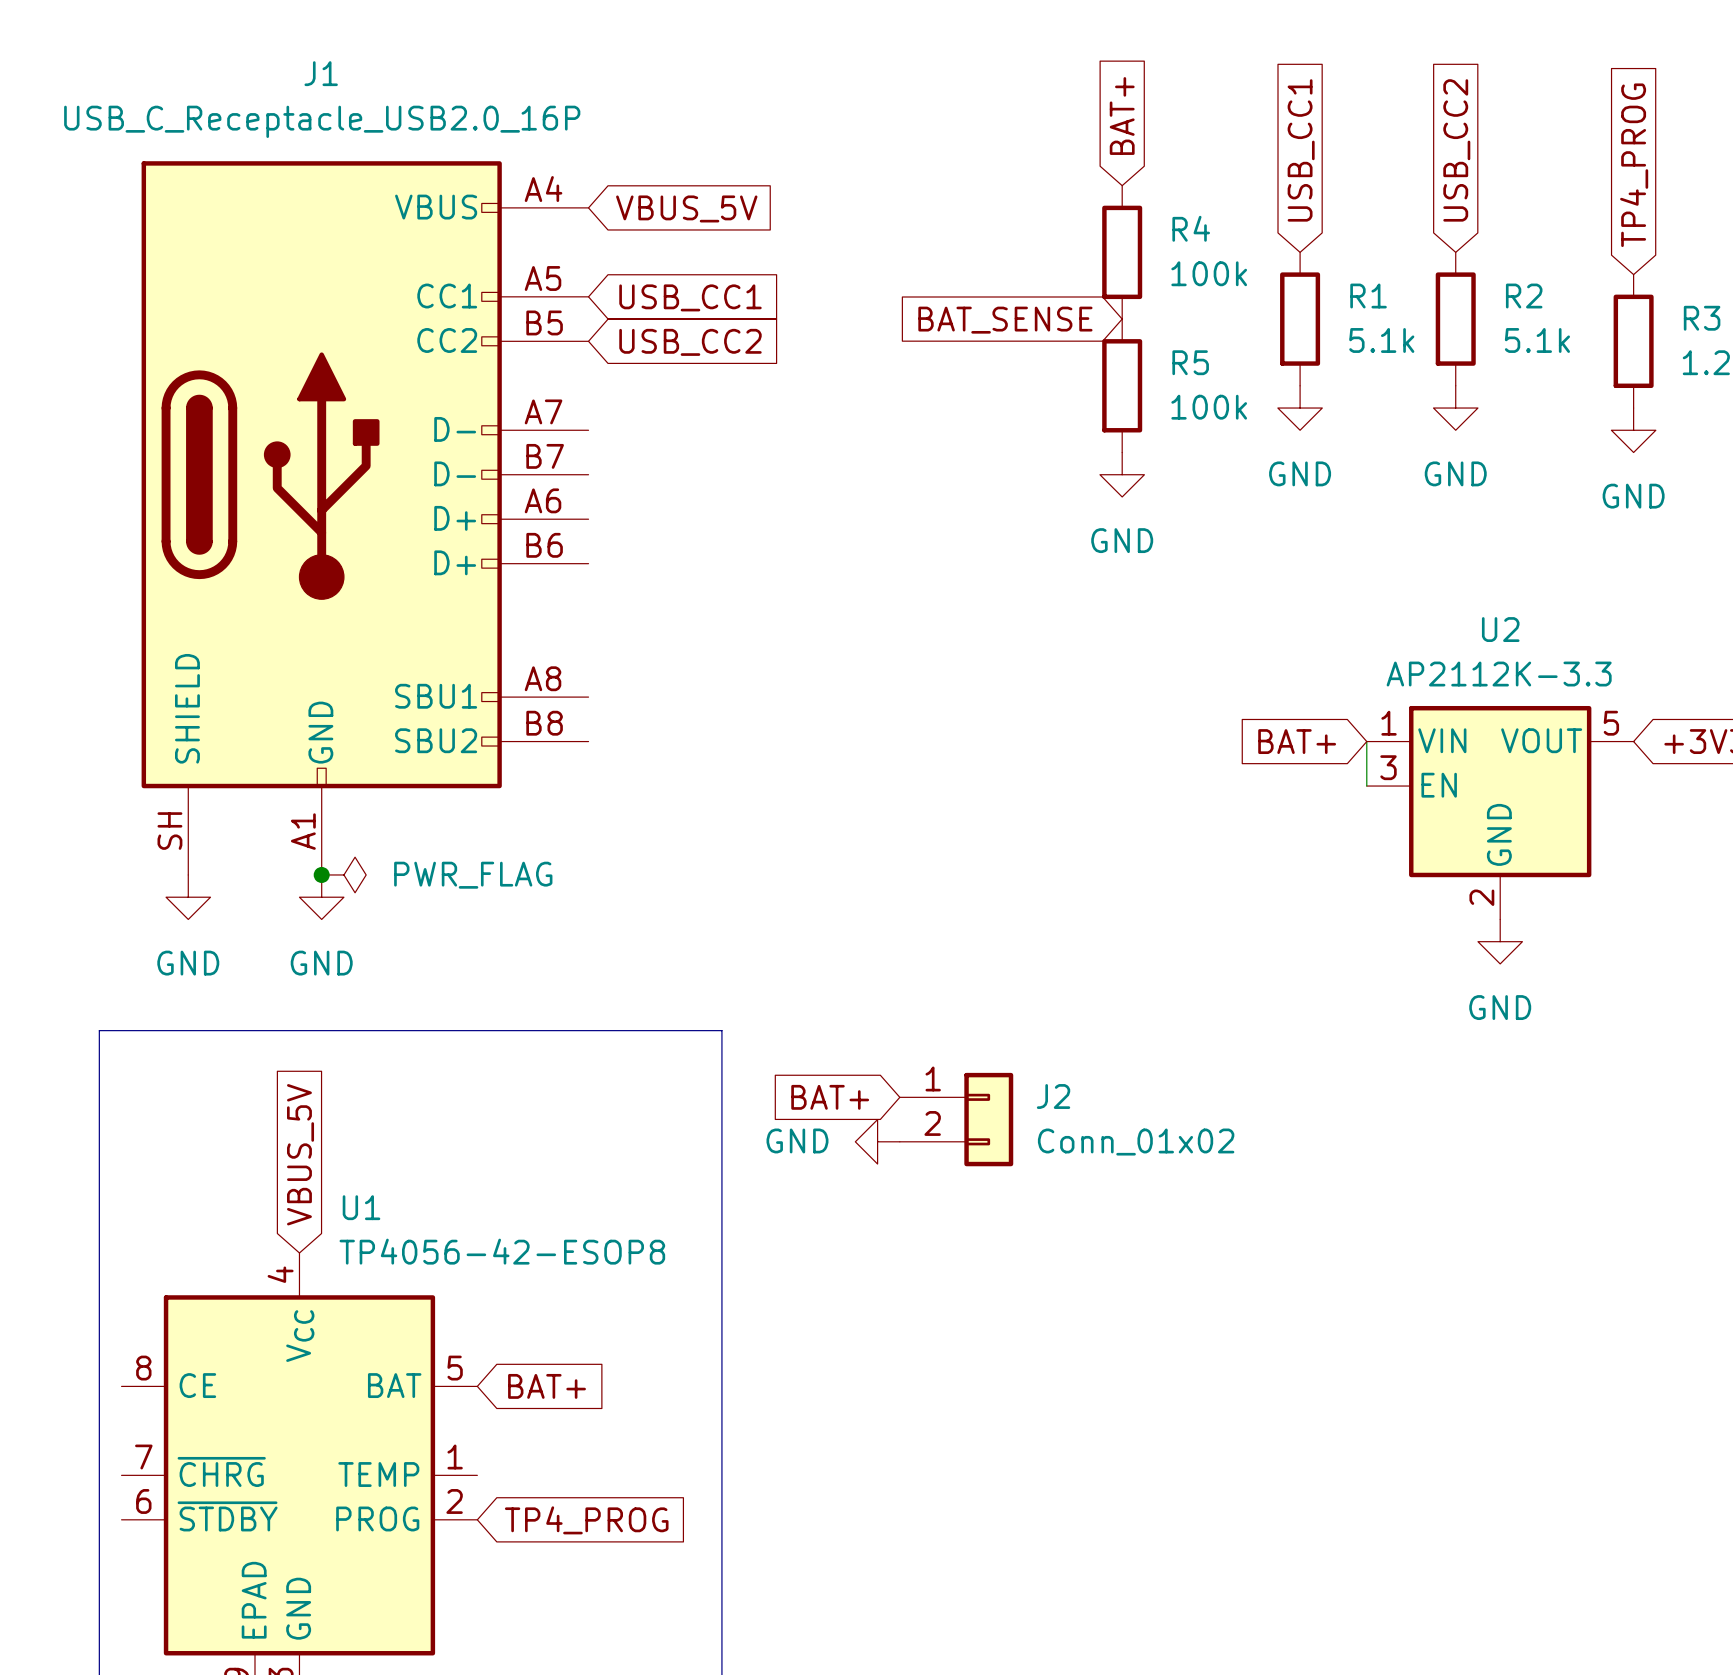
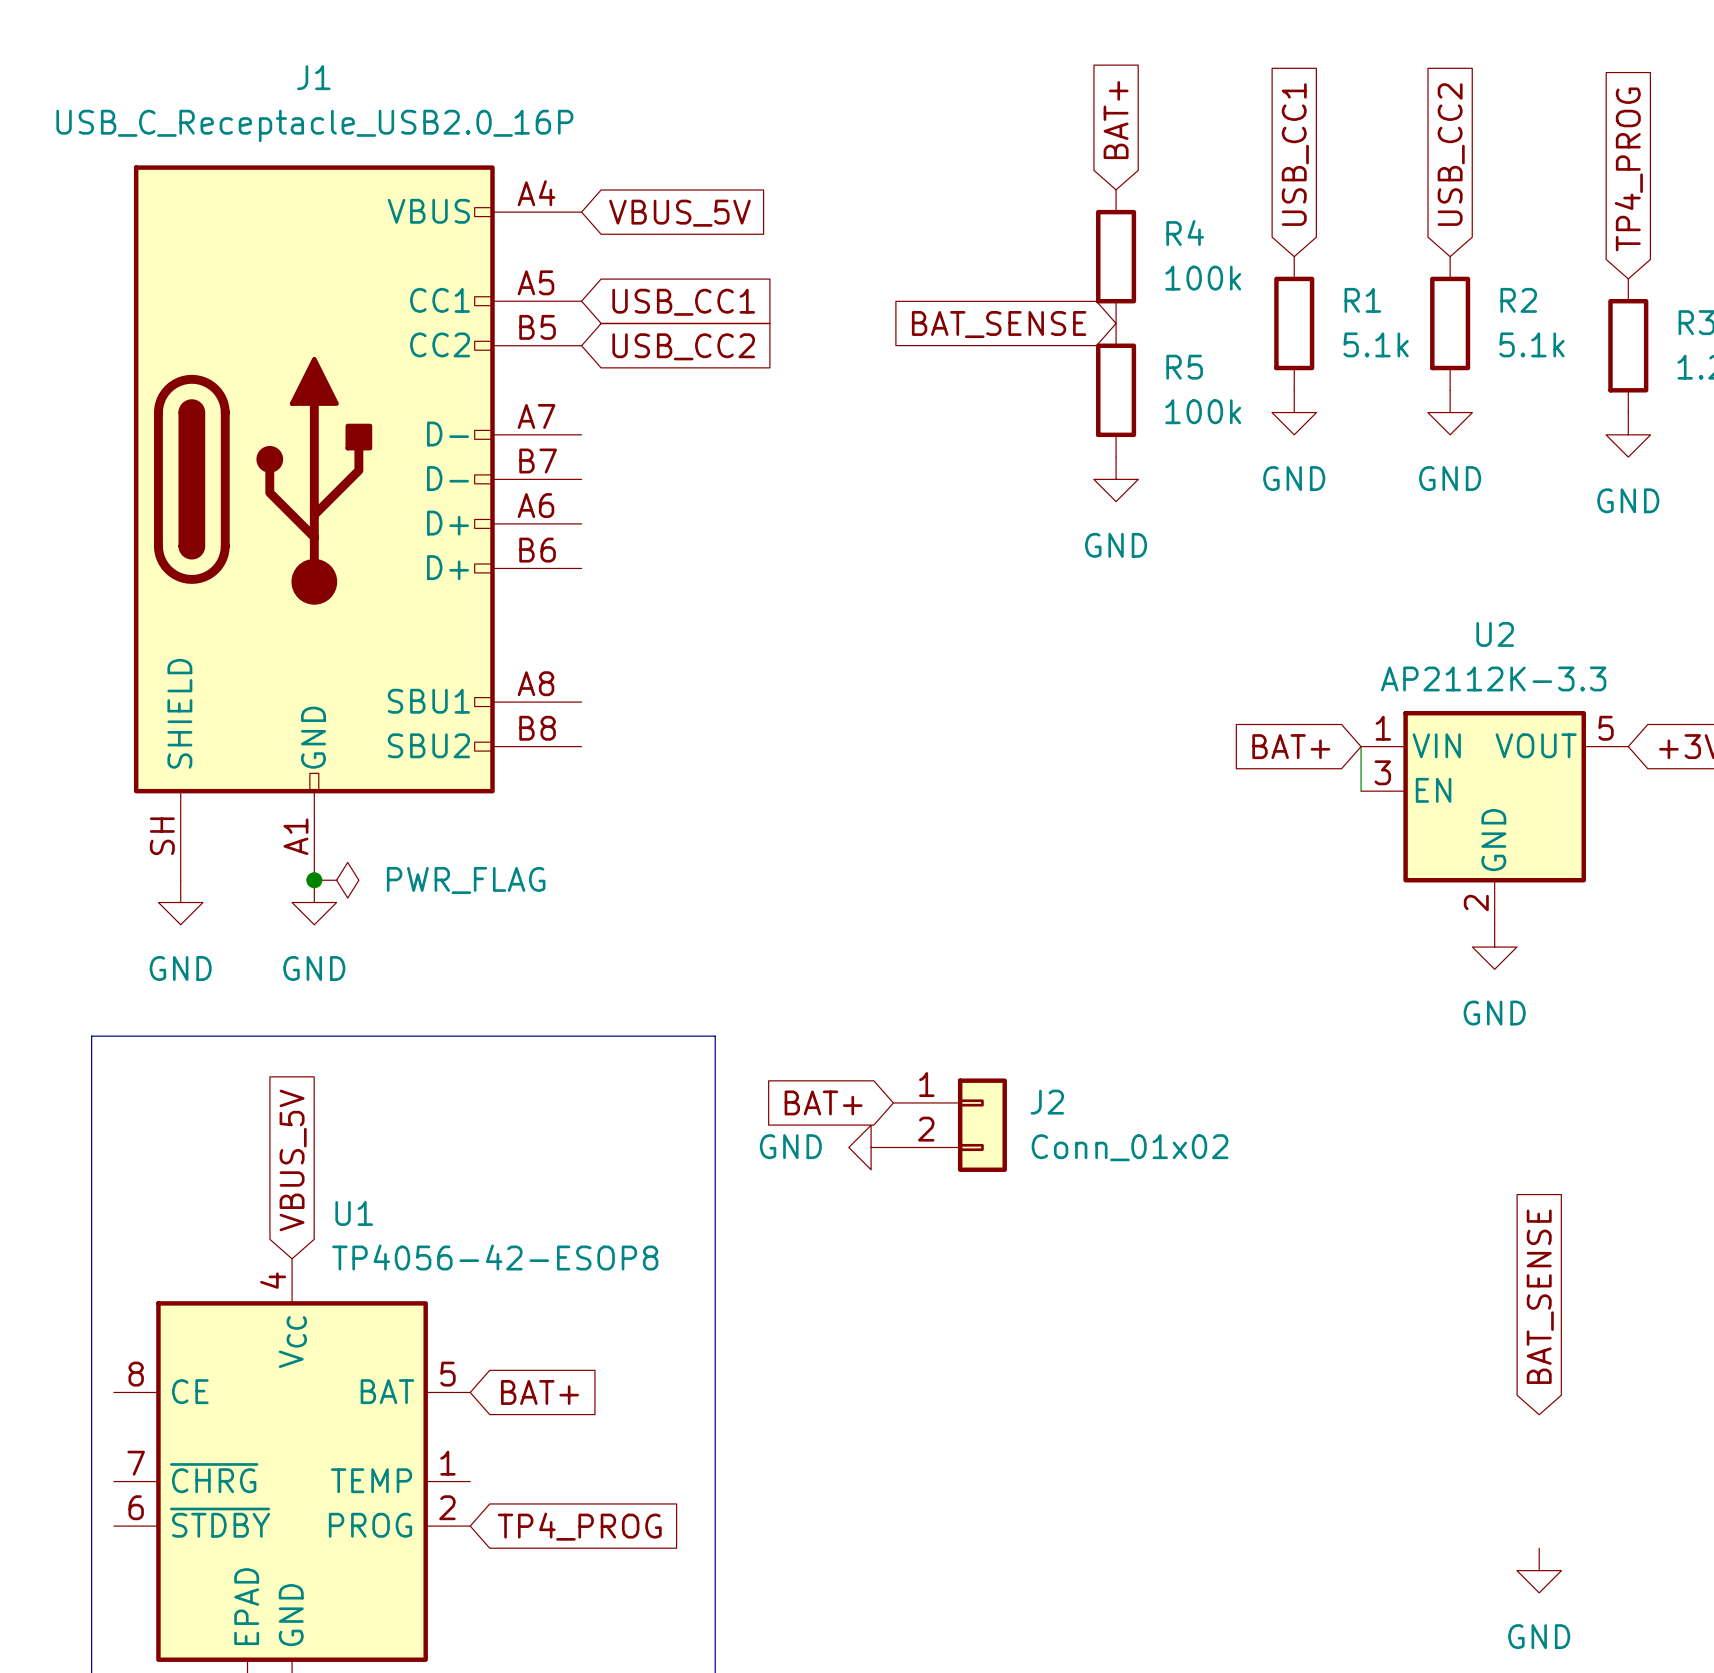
global label: none -> BAT_SENSE (1540, 1296)
power symbol: none -> GND (1539, 1570)

